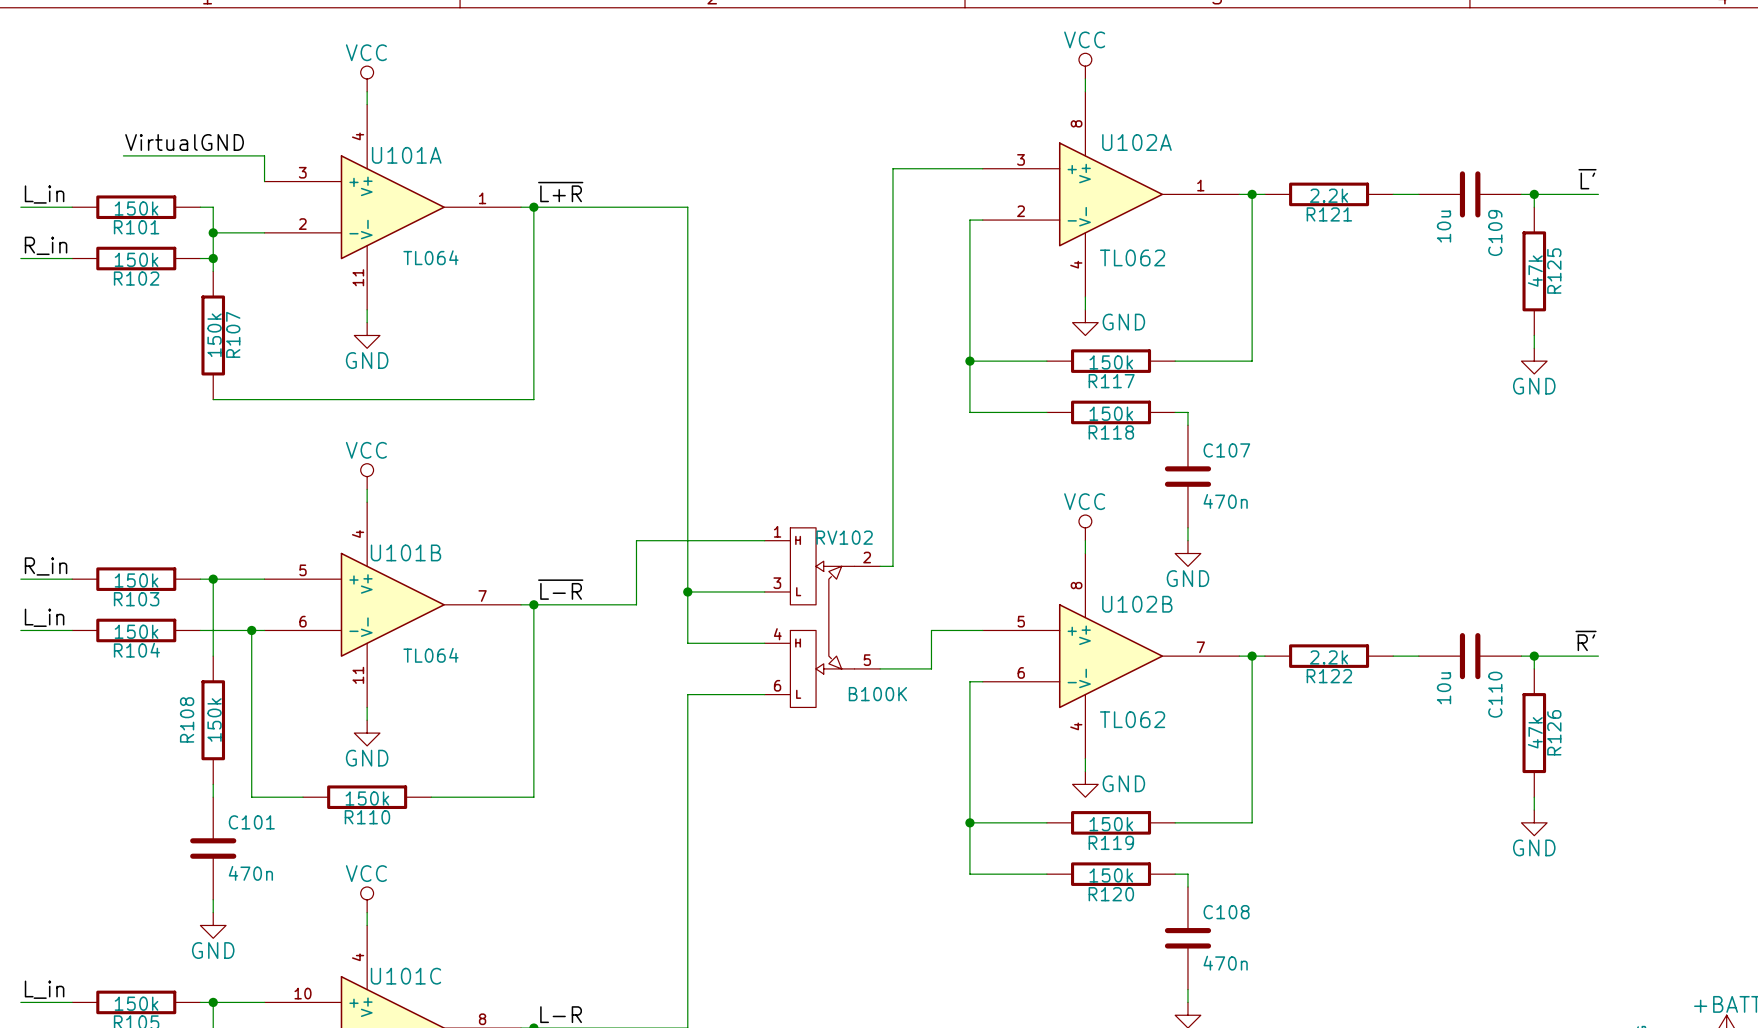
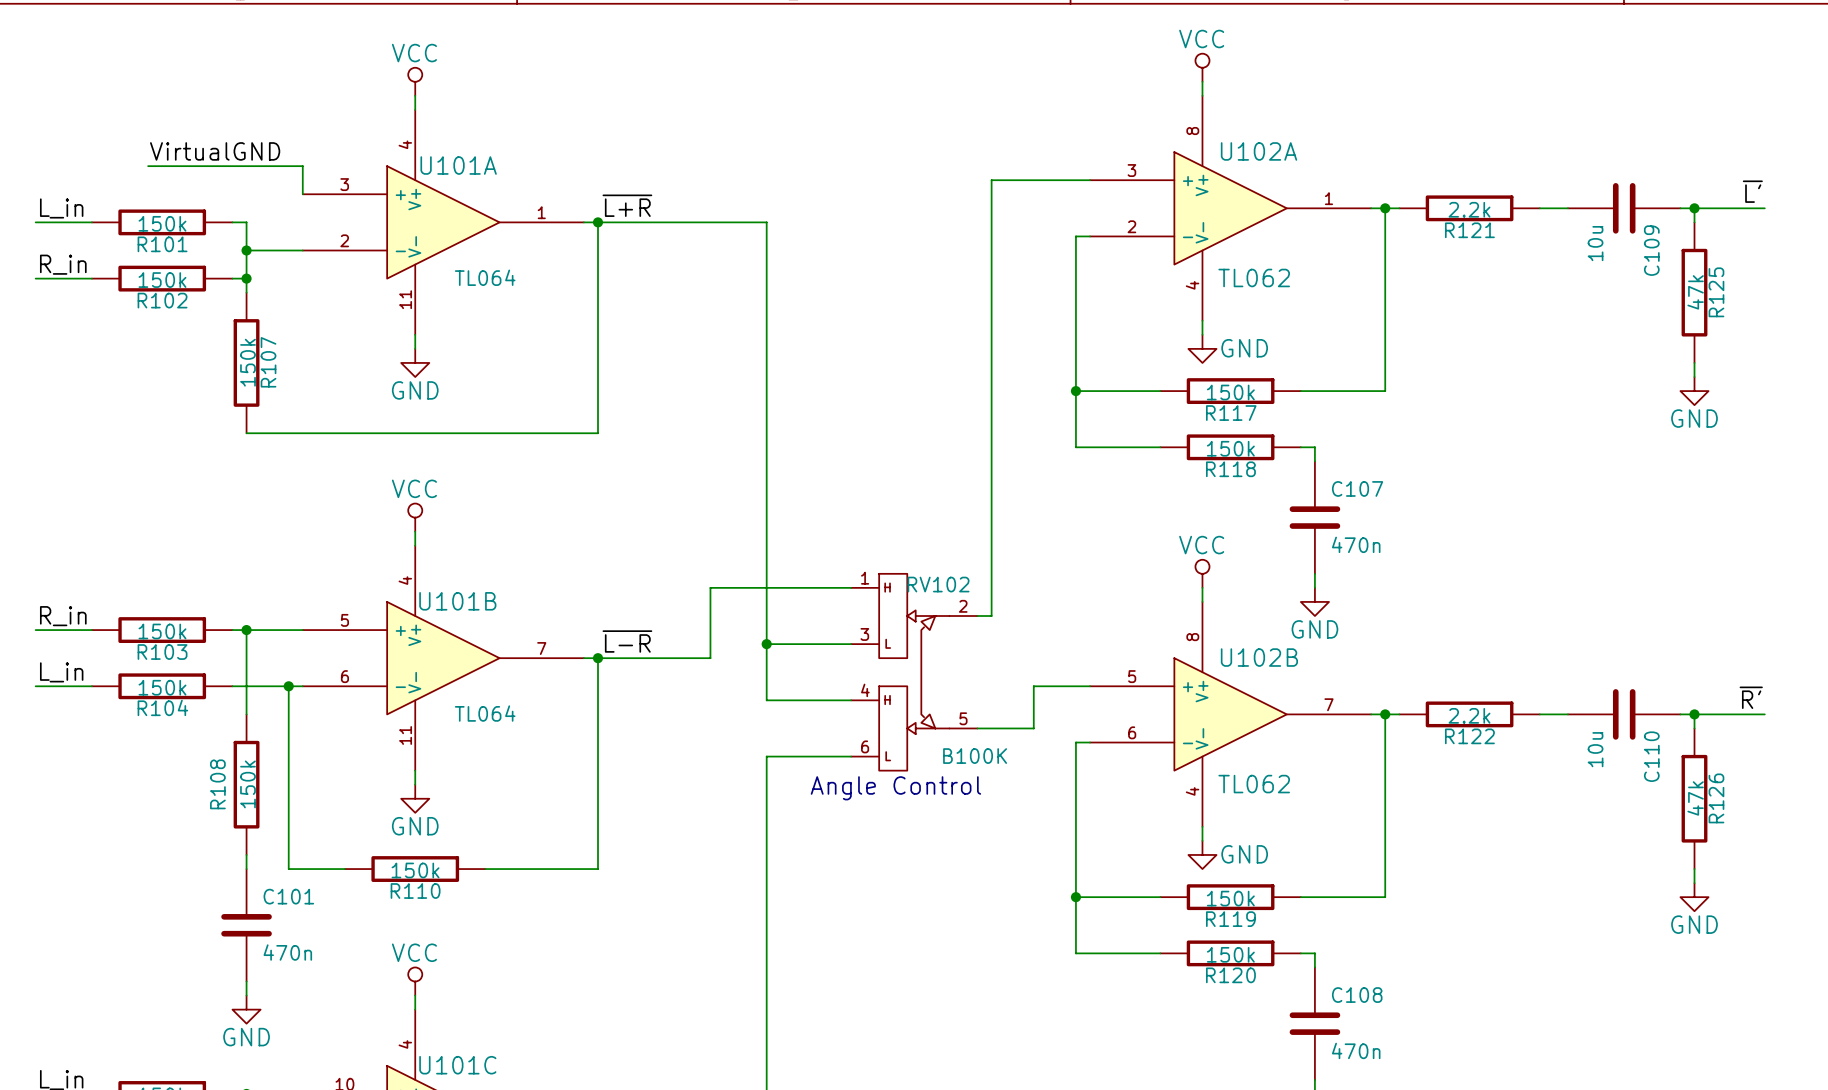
text: none -> Angle Control (895, 788)

